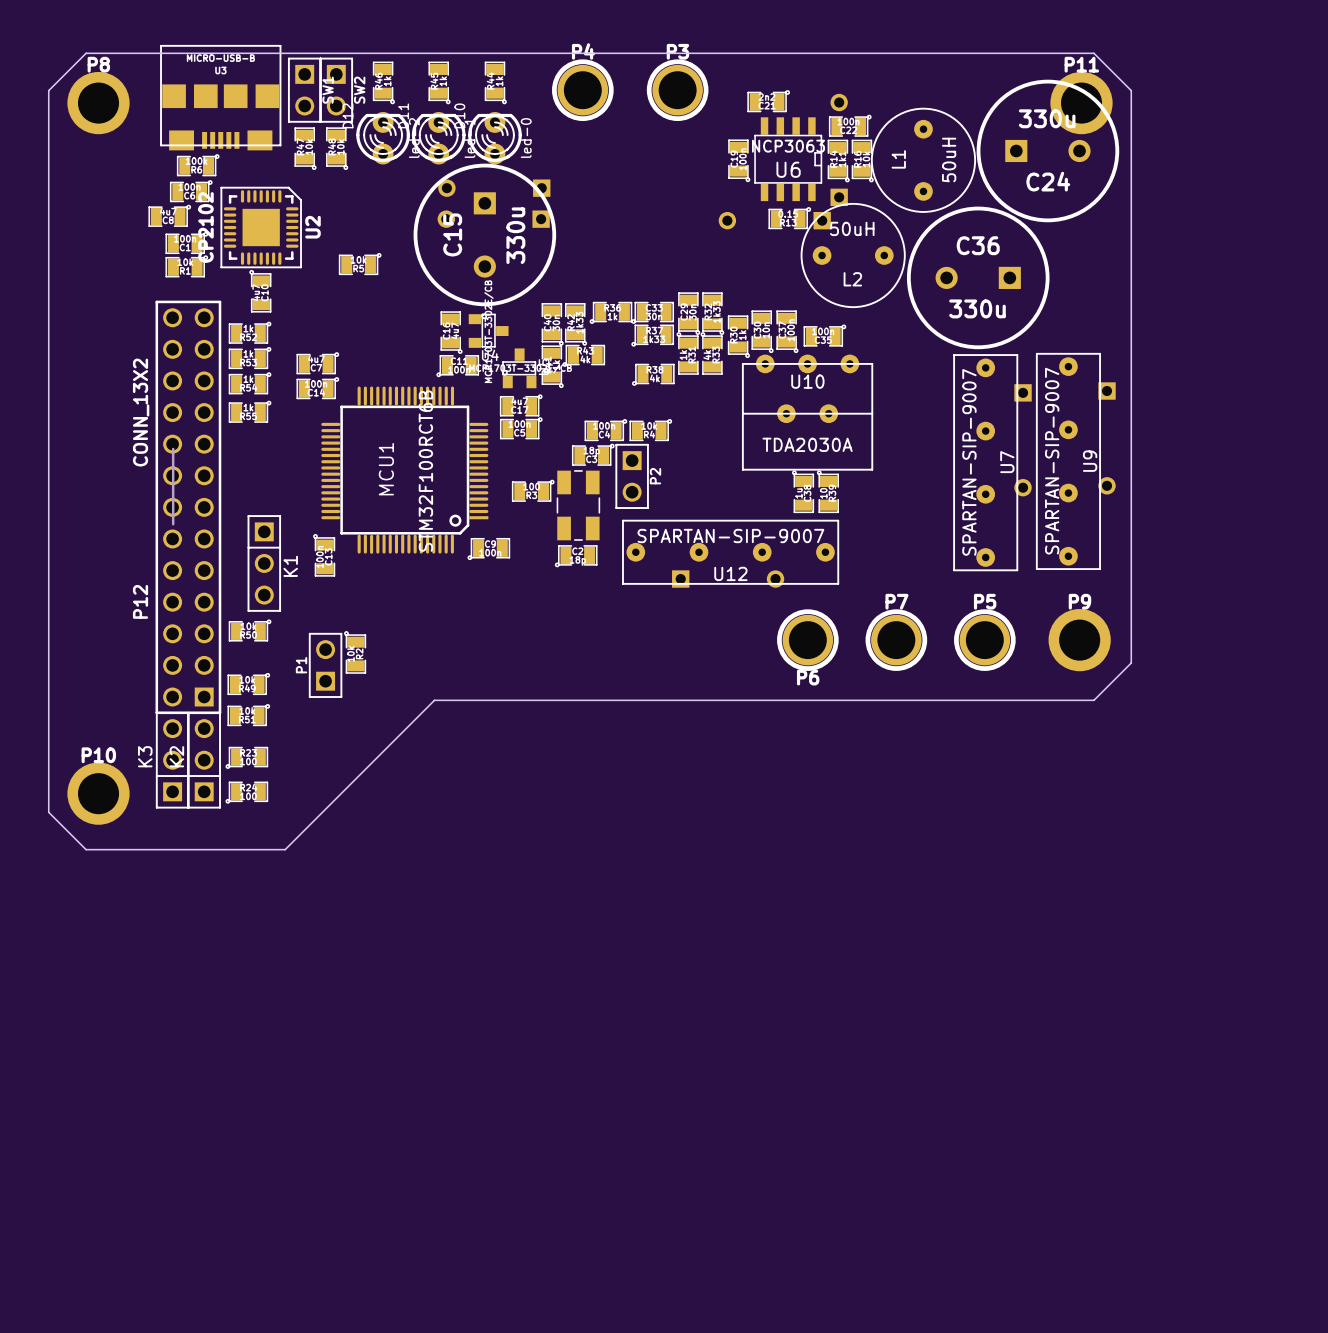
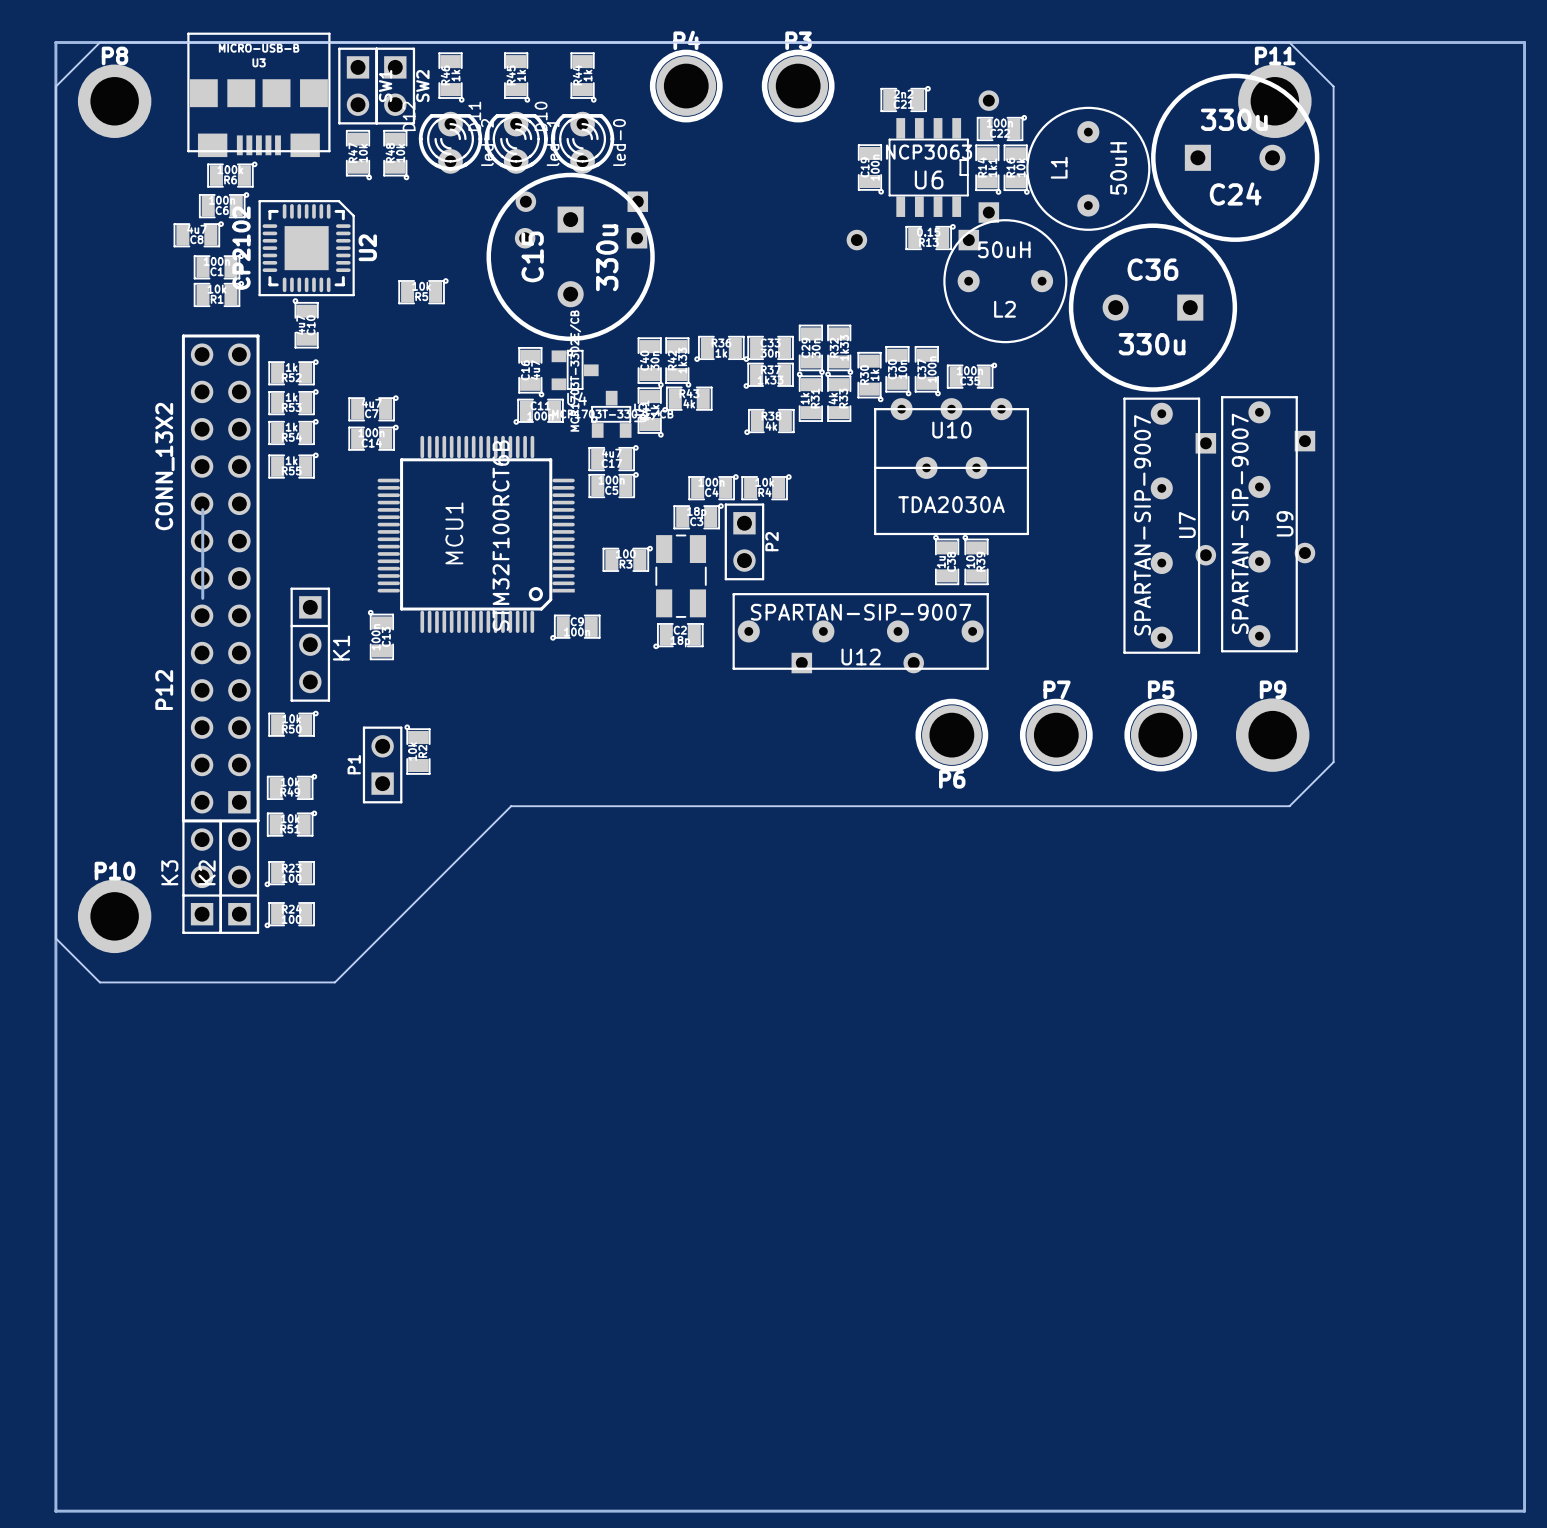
line: none -> (55, 42) (55, 1511) (1524, 1511) (1524, 42) (55, 42)

